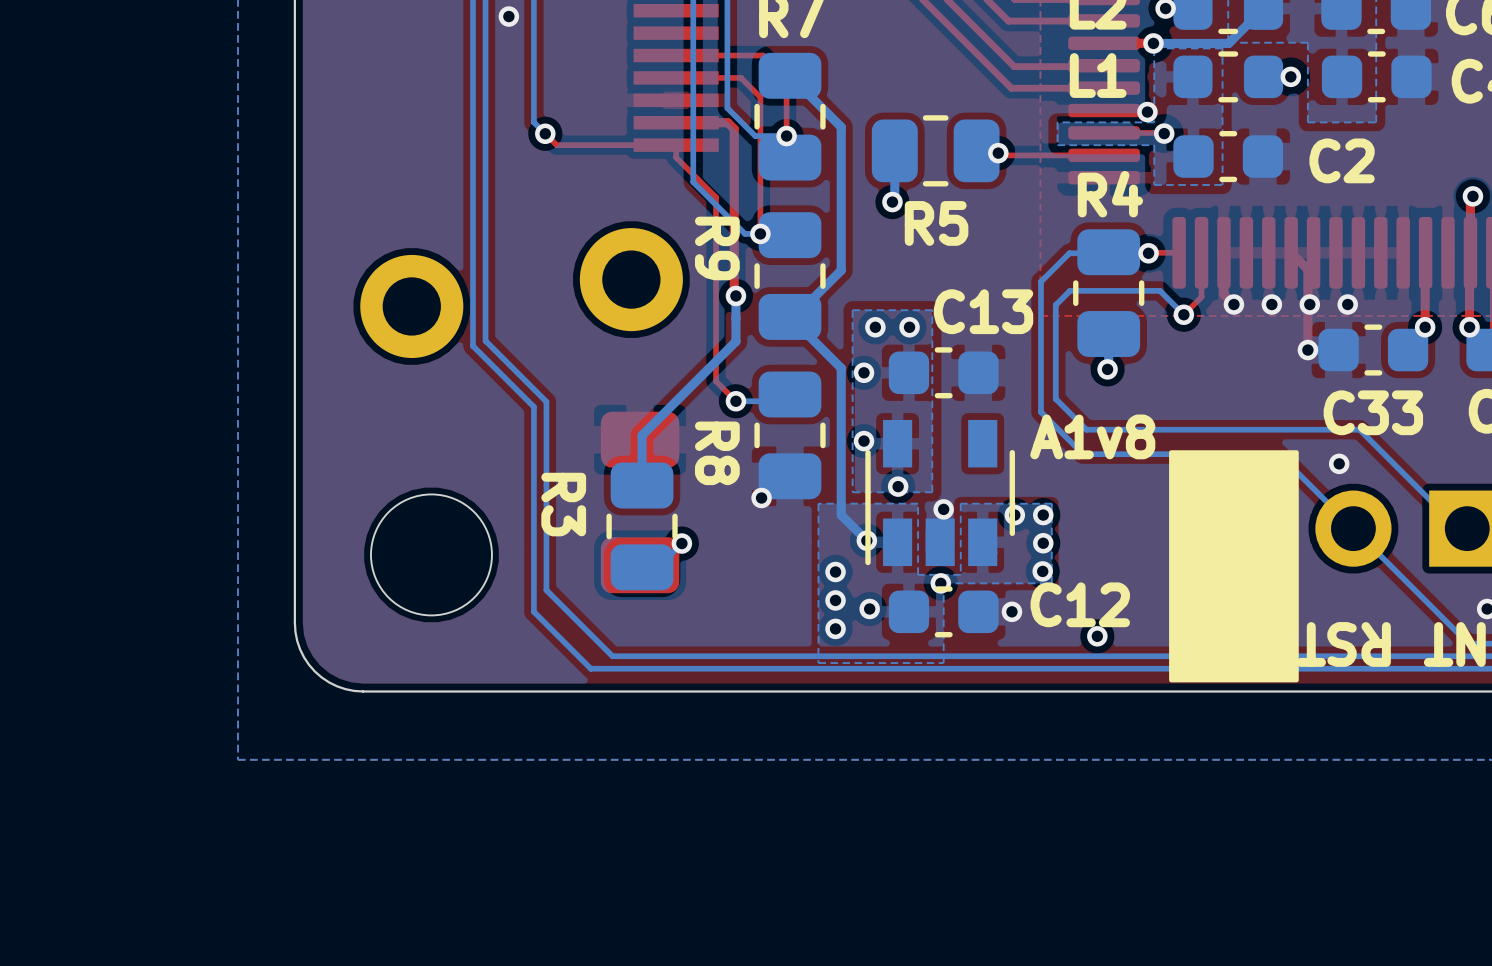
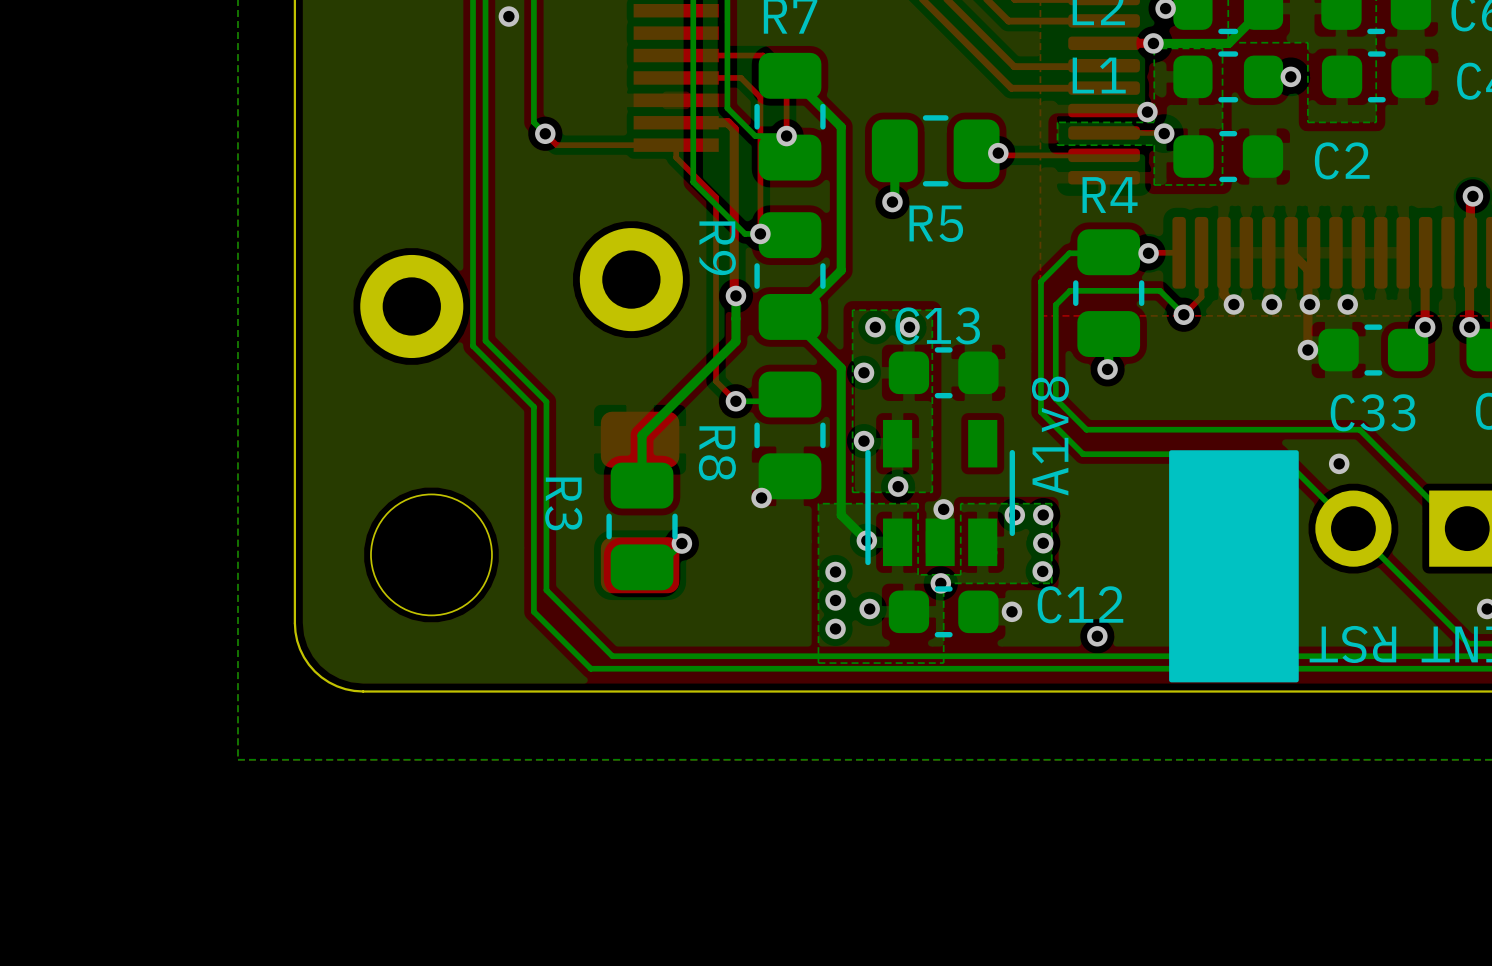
C13 name position: C13 (983, 311) -> C13 (937, 325)
text rotation: 0° (1092, 436) -> 90° counterclockwise (1050, 436)

